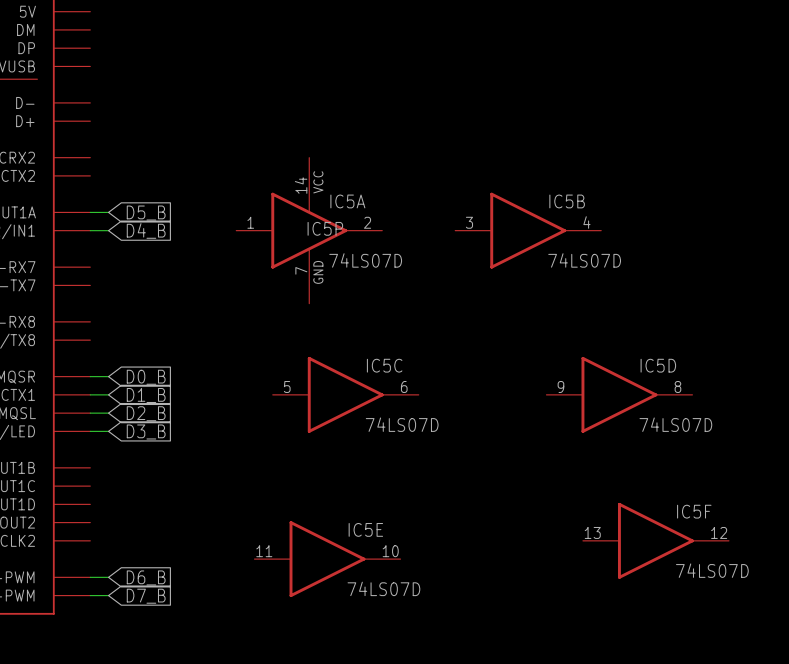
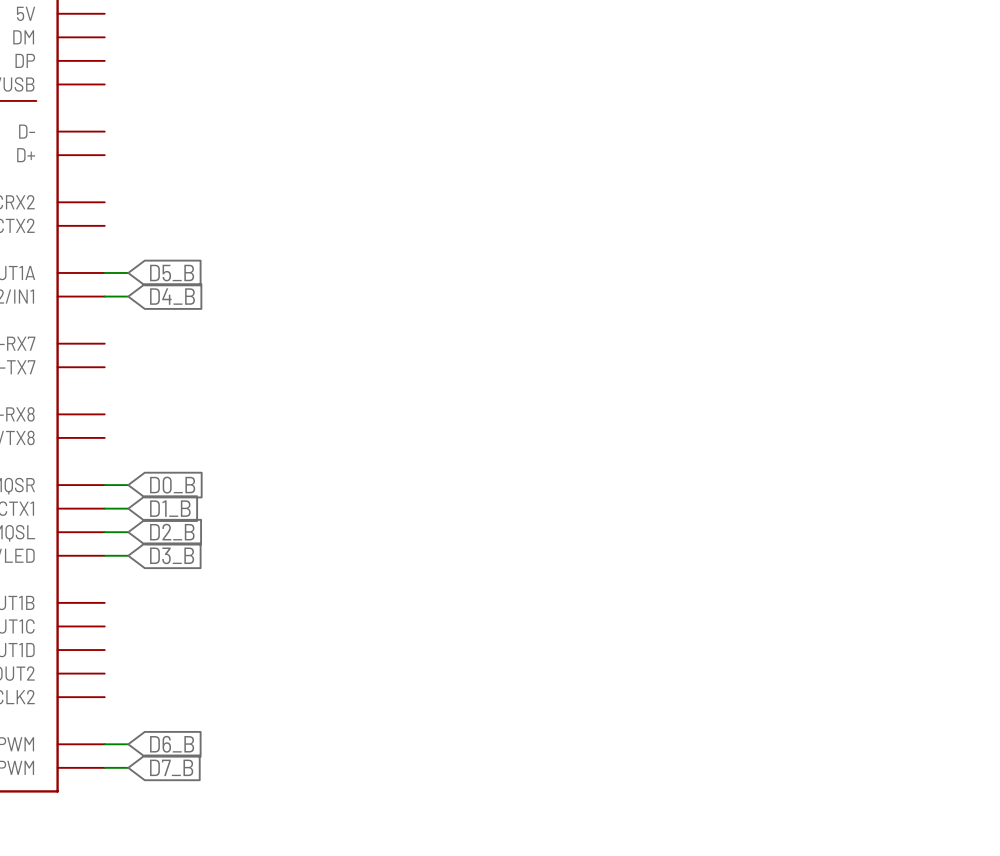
IC5A: 74LS07D (309, 230) -> none
IC5P: (309, 230) -> none
IC5B: 74LS07D (528, 230) -> none
IC5C: 74LS07D (345, 394) -> none
IC5D: 74LS07D (619, 394) -> none
IC5F: 74LS07D (655, 540) -> none
IC5E: 74LS07D (327, 559) -> none

